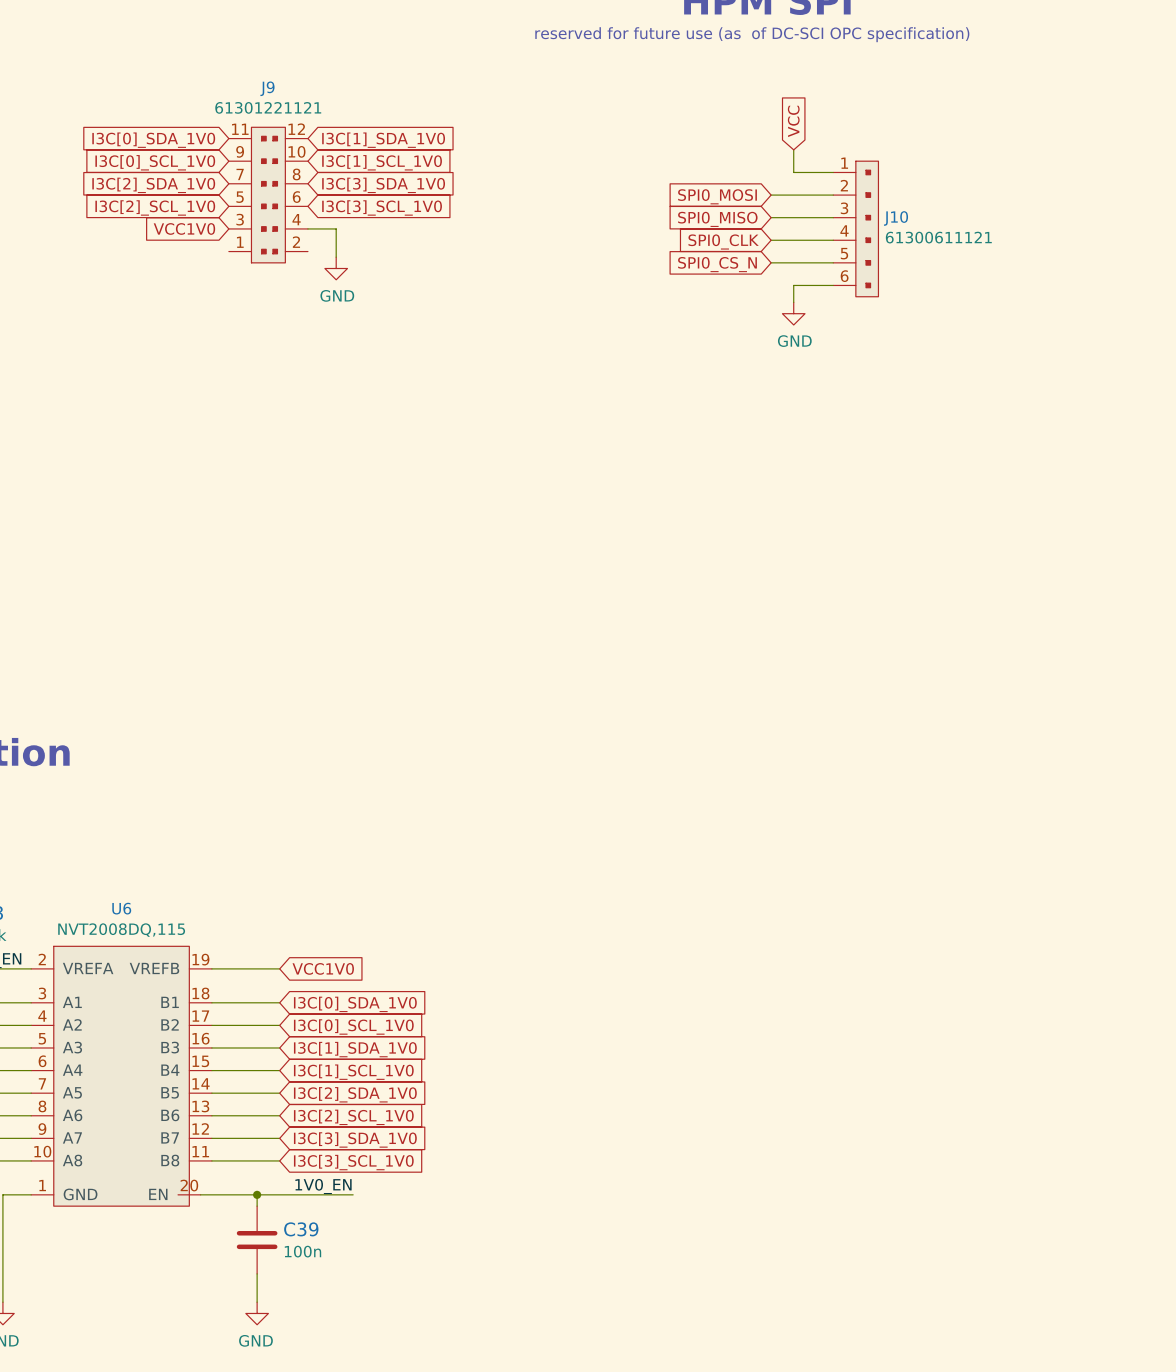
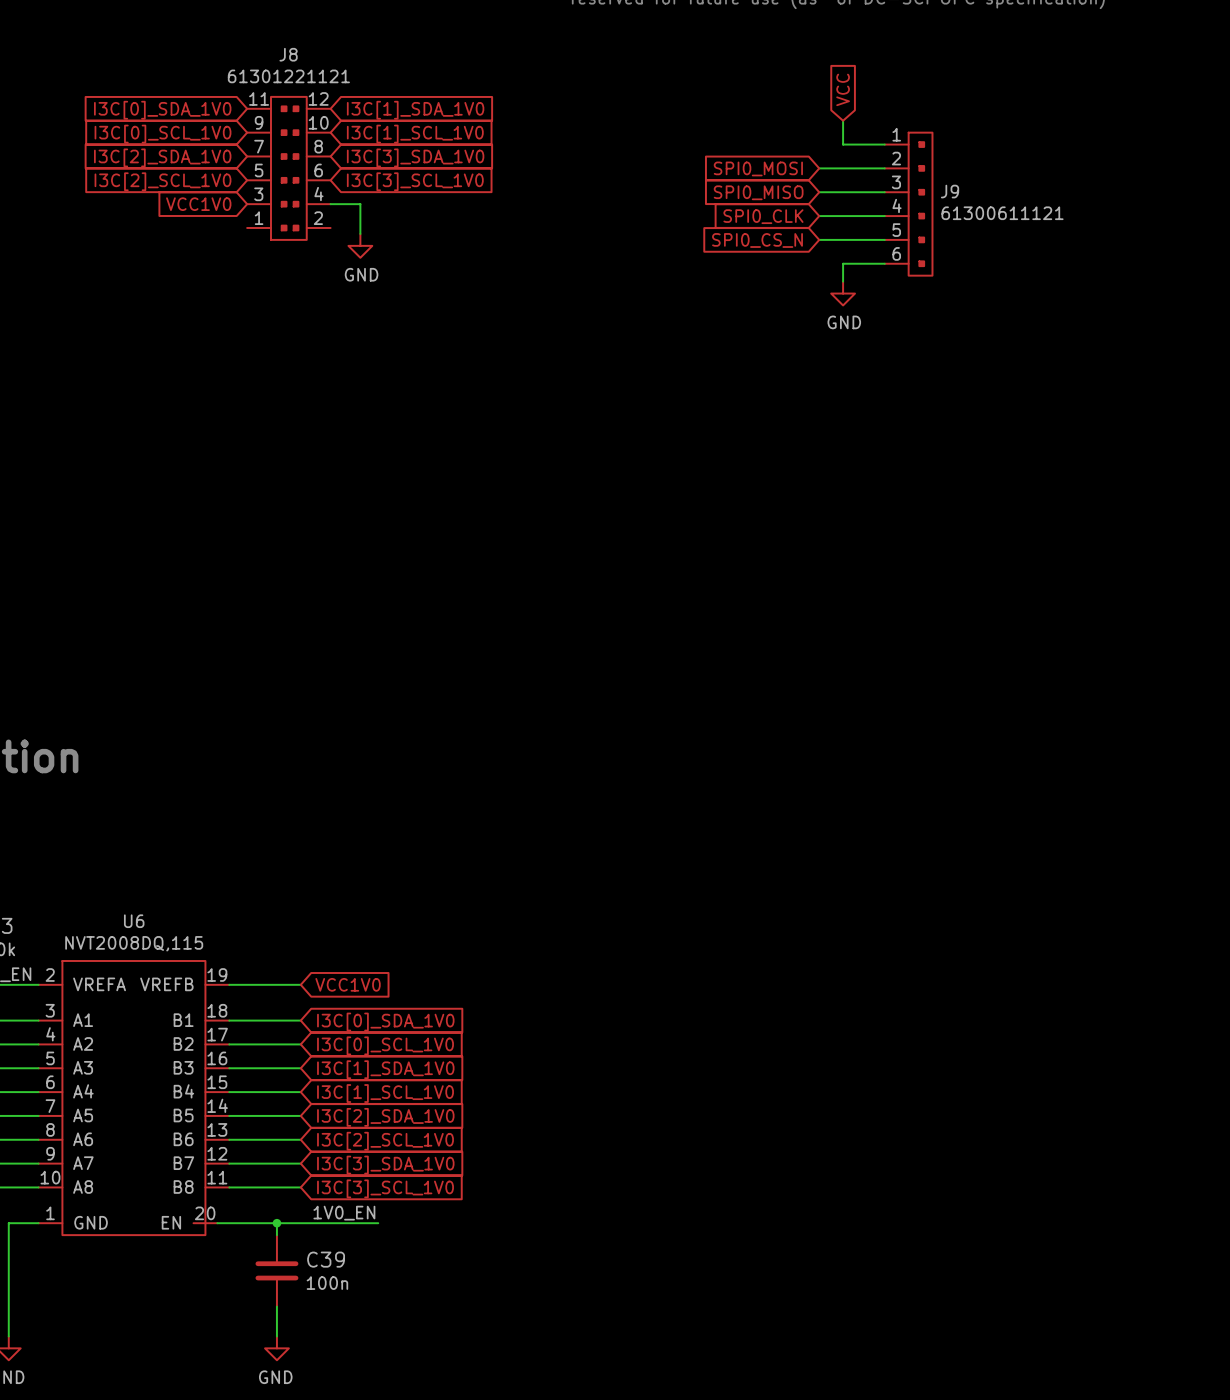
J9 name: J9 (267, 88) -> J8 (288, 54)
J10 name: J10 (896, 218) -> J9 (950, 191)

